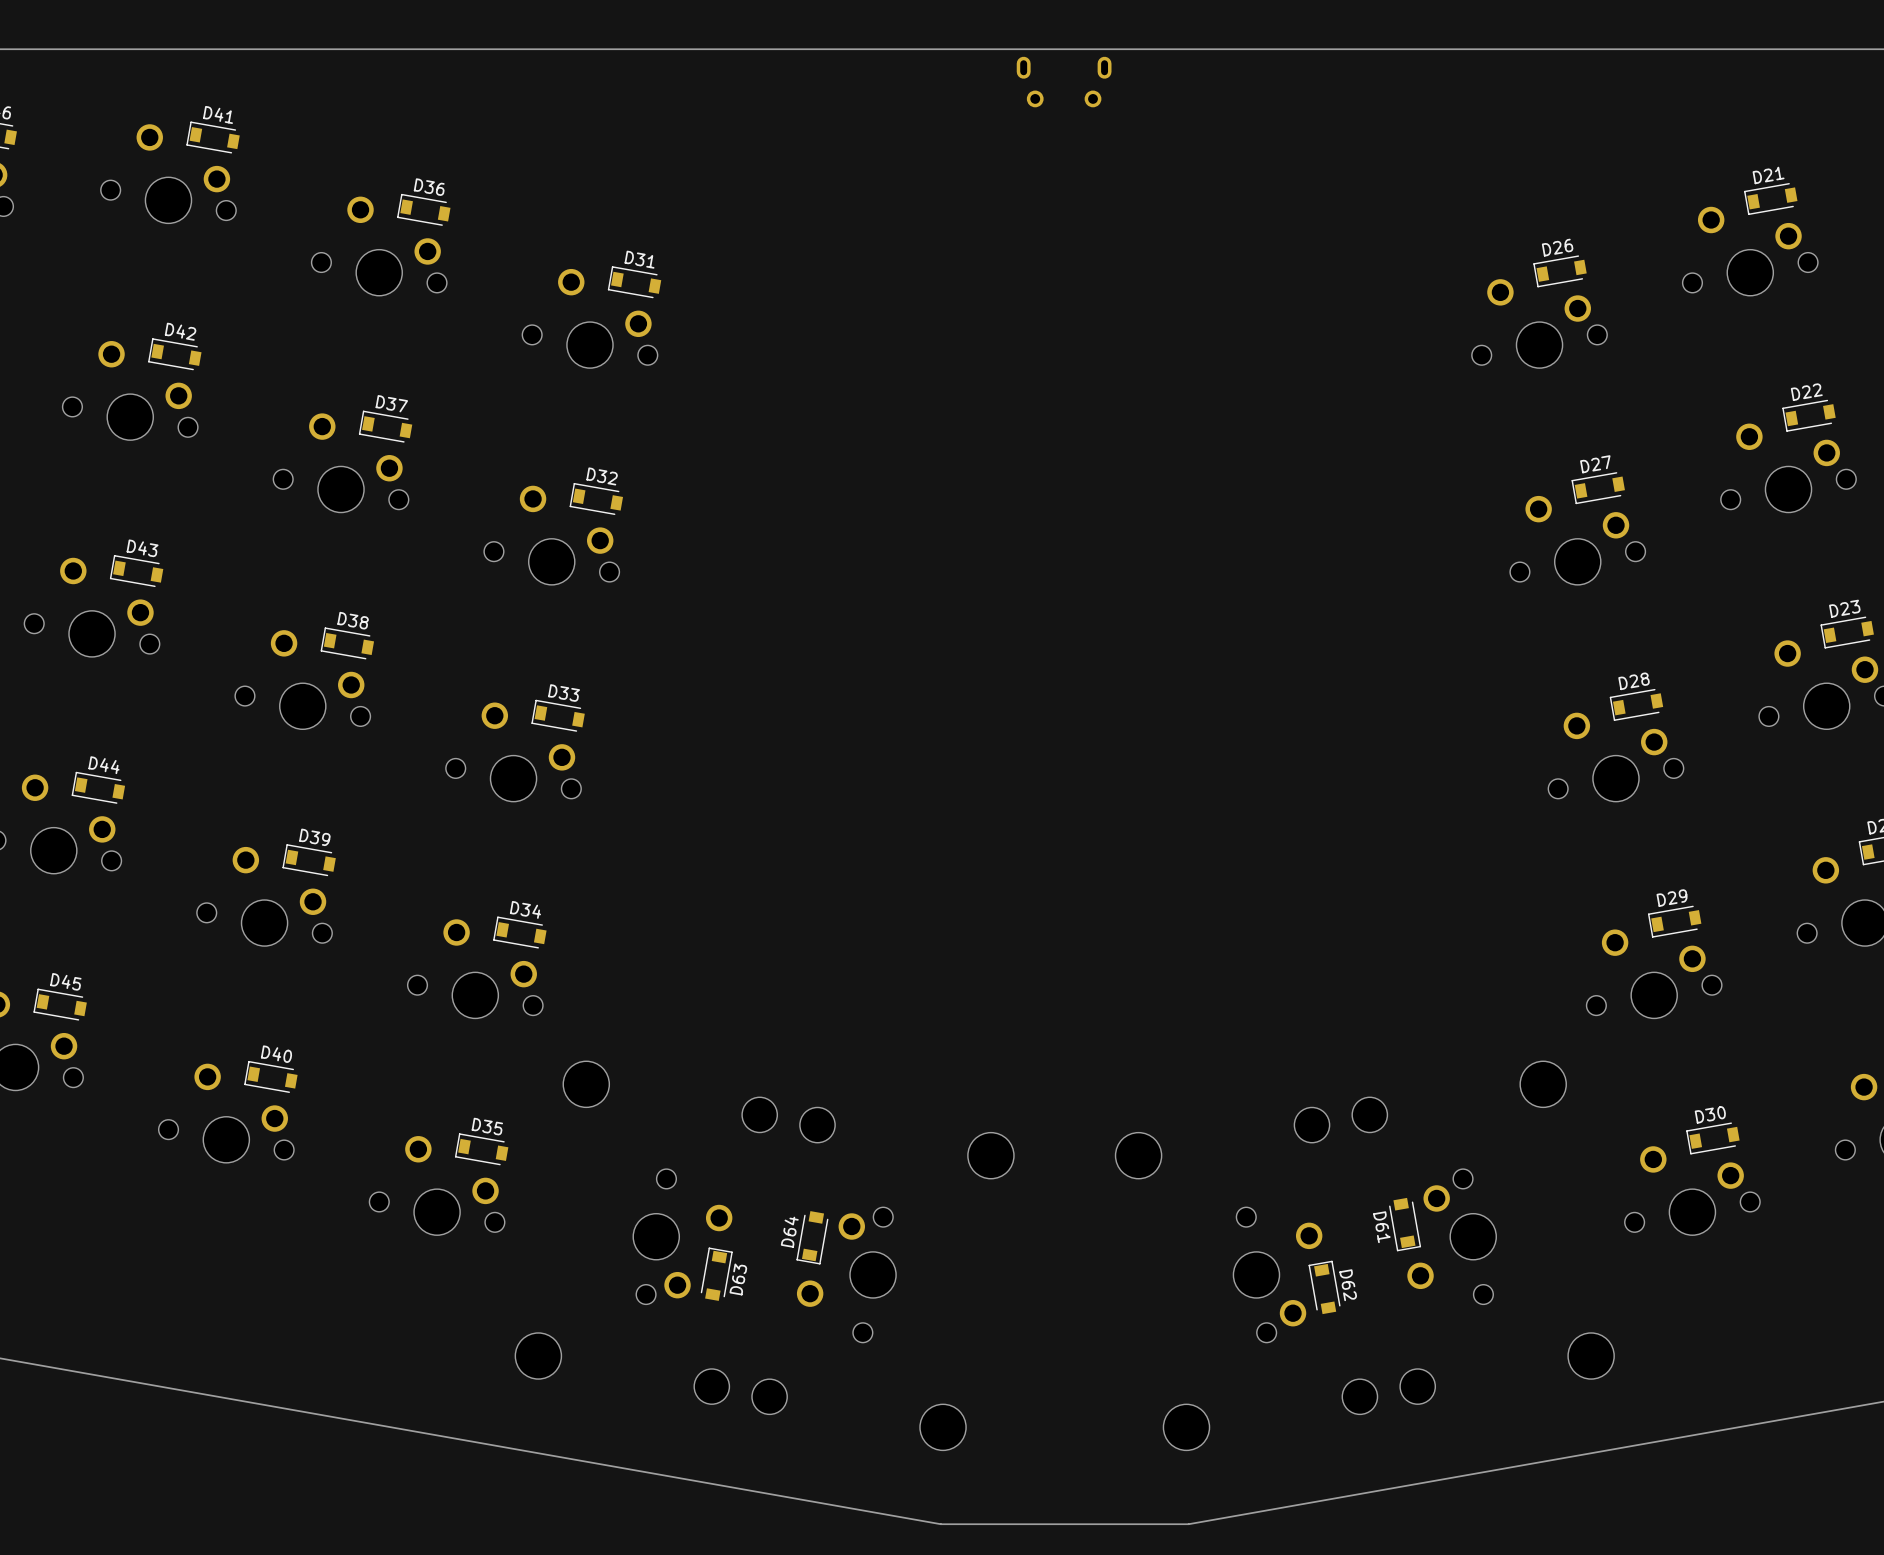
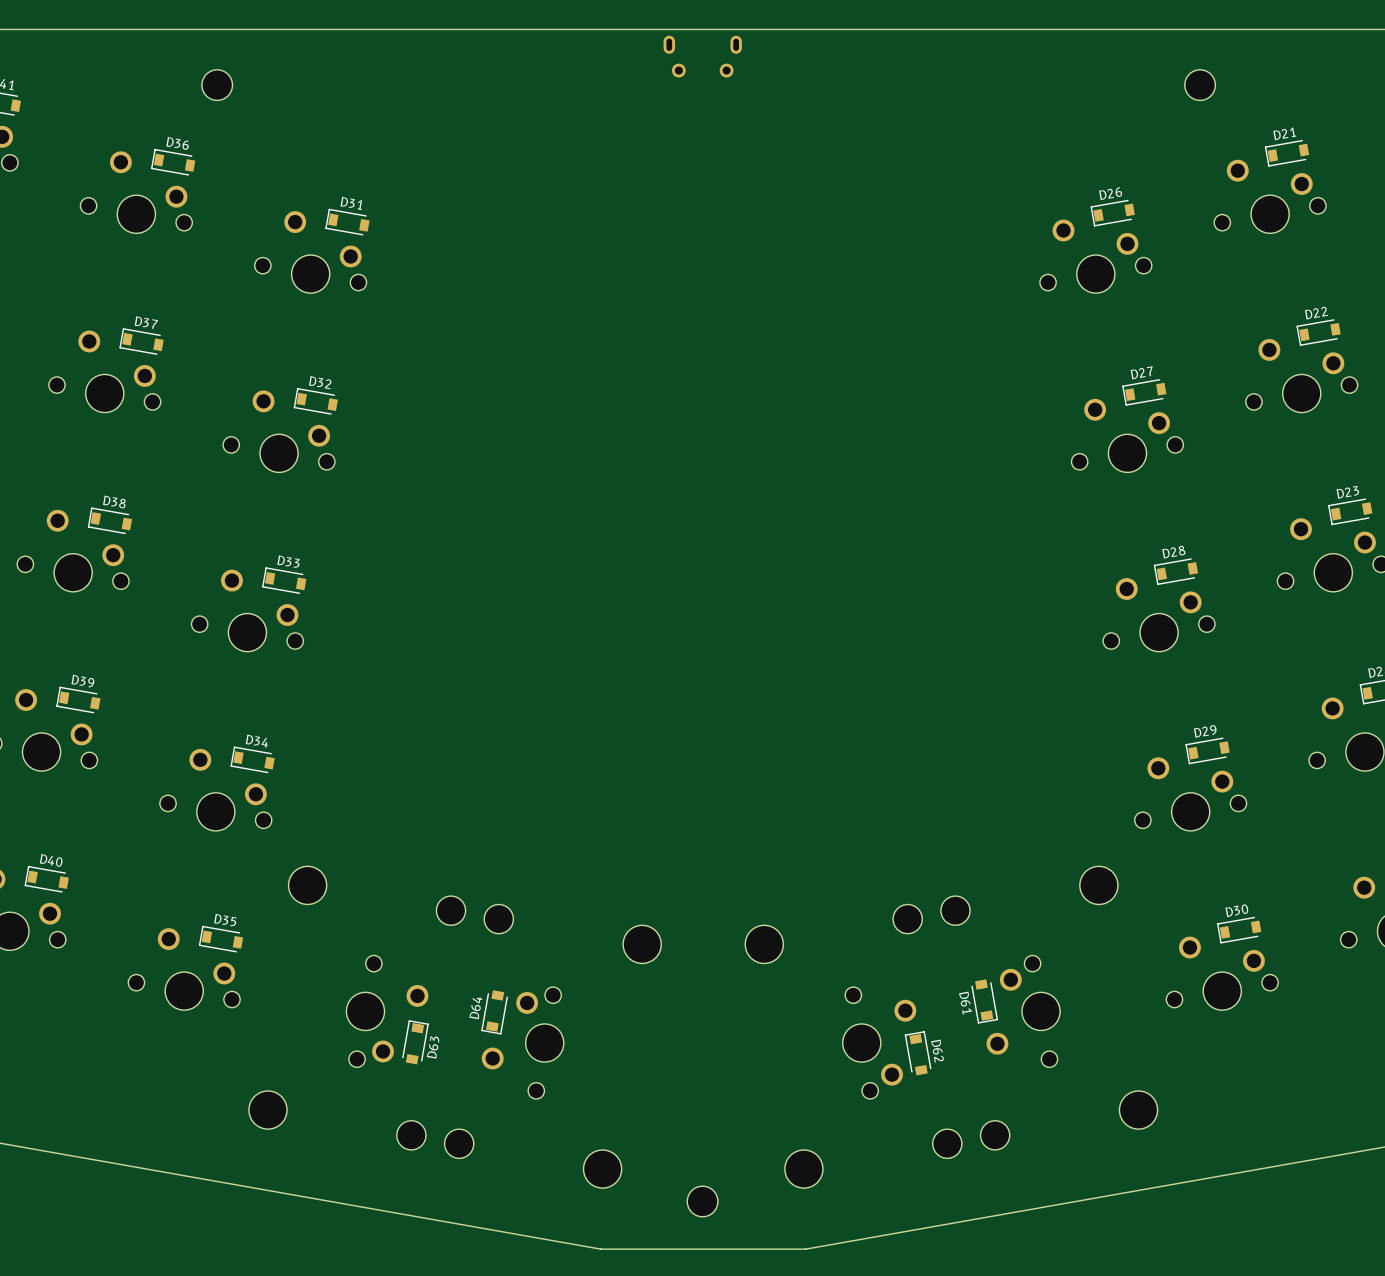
part: none -> (217, 85)
part: none -> (1200, 85)
part: none -> (702, 1201)

